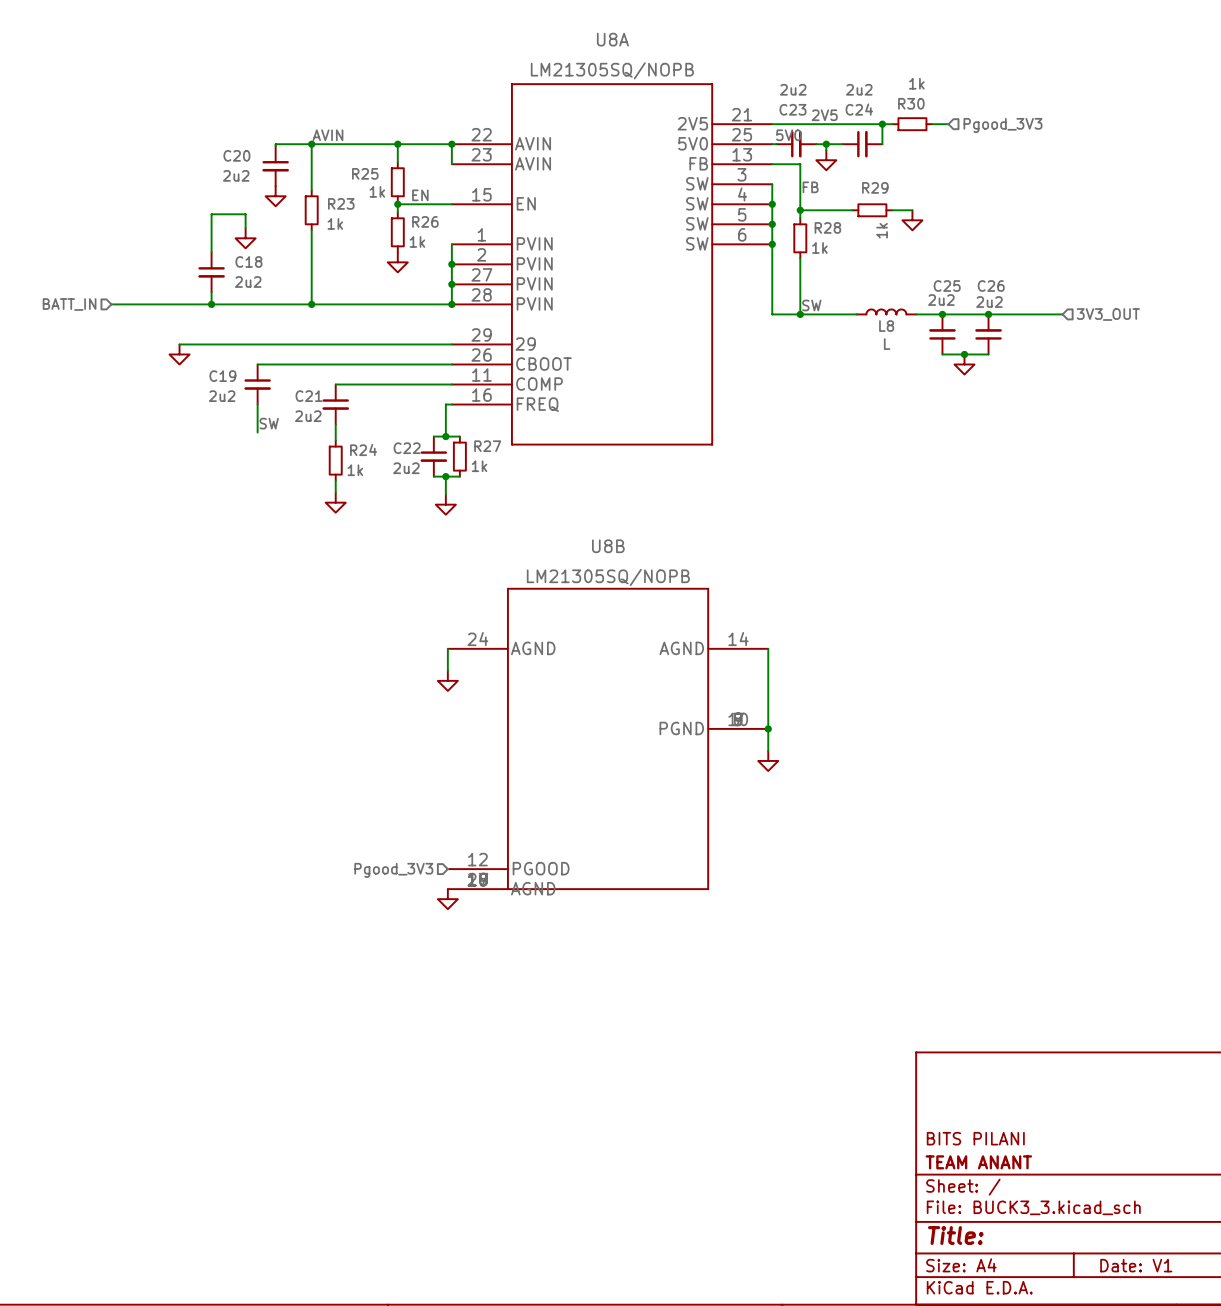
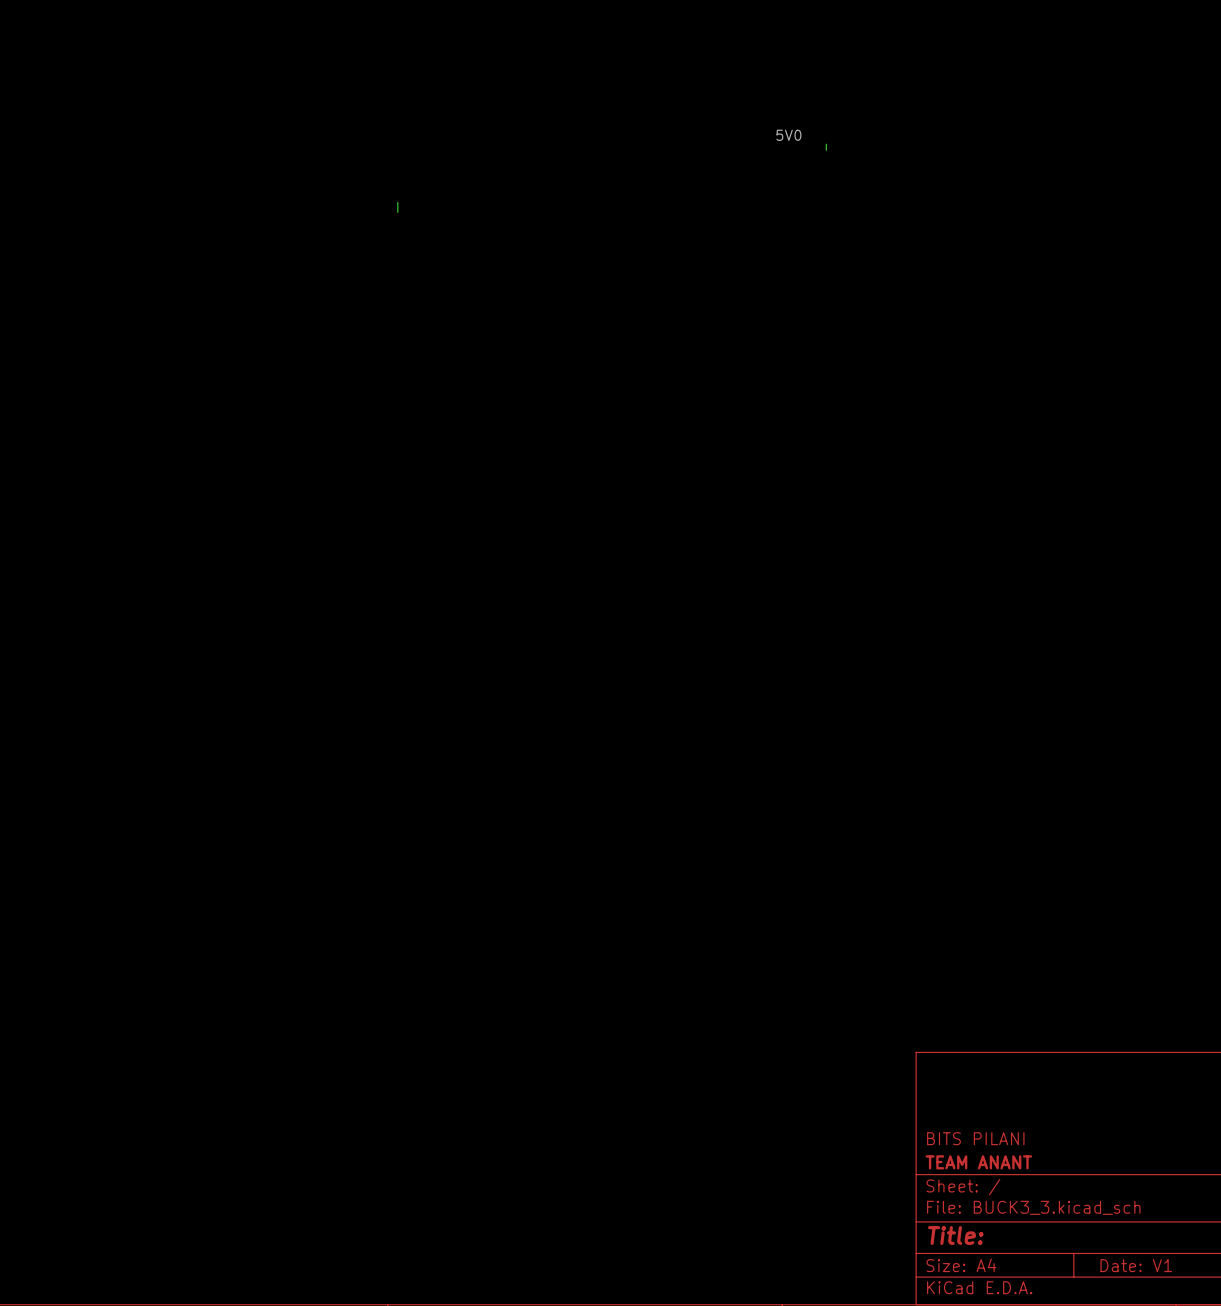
label: 2V5 (824, 115) -> none
wire: (772, 124) (892, 124) -> none
wire: (882, 124) (882, 144) -> none
junction: (882, 124) -> none
R30: 1k (912, 124) -> none
wire: (932, 124) (948, 124) -> none
hierarchical label: Pgood_3V3 (1002, 125) -> none
label: AVIN (327, 135) -> none
wire: (311, 144) (311, 190) -> none
junction: (311, 144) -> none
wire: (397, 144) (397, 162) -> none
junction: (397, 144) -> none
junction: (451, 144) -> none
wire: (772, 144) (776, 144) -> none
C23: 2u2 (796, 144) -> none
wire: (816, 144) (842, 144) -> none
junction: (826, 144) -> none
C24: 2u2 (862, 144) -> none
wire: (275, 146) (275, 144) (451, 144) (451, 164) -> none
power symbol: (826, 160) -> none
wire: (772, 164) (800, 164) (800, 218) -> none
C20: 2u2 (275, 166) -> none
R25: 1k (397, 182) -> none
wire: (772, 184) (772, 314) (856, 314) -> none
label: FB (810, 187) -> none
label: EN (420, 195) -> none
power symbol: (275, 196) -> none
wire: (397, 204) (451, 204) -> none
junction: (397, 204) -> none
junction: (772, 204) -> none
R23: 1k (311, 210) -> none
wire: (800, 210) (852, 210) -> none
junction: (800, 210) -> none
R29: 1k (872, 210) -> none
wire: (892, 210) (912, 210) -> none
power symbol: (912, 220) -> none
junction: (772, 224) -> none
wire: (245, 228) (245, 214) (211, 214) (211, 252) -> none
wire: (311, 230) (311, 304) -> none
R26: 1k (397, 232) -> none
power symbol: (245, 238) -> none
R28: 1k (800, 238) -> none
wire: (451, 244) (451, 304) (111, 304) -> none
junction: (772, 244) -> none
wire: (800, 258) (800, 314) -> none
power symbol: (397, 262) -> none
junction: (451, 264) -> none
U8A: LM21305SQ/NOPB (612, 264) -> none
C18: 2u2 (211, 272) -> none
junction: (451, 284) -> none
wire: (211, 292) (211, 304) -> none
hierarchical label: BATT_IN (69, 304) -> none
junction: (211, 304) -> none
junction: (311, 304) -> none
junction: (451, 304) -> none
label: SW (811, 305) -> none
L8: L (886, 311) -> none
junction: (800, 314) -> none
wire: (916, 314) (1062, 314) -> none
junction: (942, 314) -> none
junction: (988, 314) -> none
hierarchical label: 3V3_OUT (1108, 314) -> none
C25: 2u2 (942, 334) -> none
C26: 2u2 (988, 334) -> none
wire: (179, 344) (451, 344) -> none
power symbol: (179, 354) -> none
wire: (942, 354) (988, 354) -> none
junction: (964, 354) -> none
wire: (257, 364) (451, 364) -> none
power symbol: (964, 364) -> none
C19: 2u2 (257, 384) -> none
wire: (335, 384) (451, 384) -> none
wire: (257, 404) (257, 432) -> none
C21: 2u2 (335, 404) -> none
wire: (451, 404) (445, 404) (445, 436) -> none
label: SW (269, 423) -> none
wire: (335, 424) (335, 440) -> none
wire: (433, 436) (459, 436) -> none
junction: (445, 436) -> none
C22: 2u2 (433, 456) -> none
R27: 1k (459, 456) -> none
R24: 1k (335, 460) -> none
wire: (433, 476) (459, 476) -> none
wire: (445, 476) (445, 494) -> none
junction: (445, 476) -> none
wire: (335, 480) (335, 492) -> none
power symbol: (335, 502) -> none
power symbol: (445, 504) -> none
wire: (447, 648) (447, 670) -> none
wire: (768, 648) (768, 750) -> none
power symbol: (447, 680) -> none
junction: (768, 728) -> none
U8B: LM21305SQ/NOPB (608, 738) -> none
power symbol: (768, 760) -> none
hierarchical label: Pgood_3V3 (393, 870) -> none
power symbol: (447, 899) -> none

